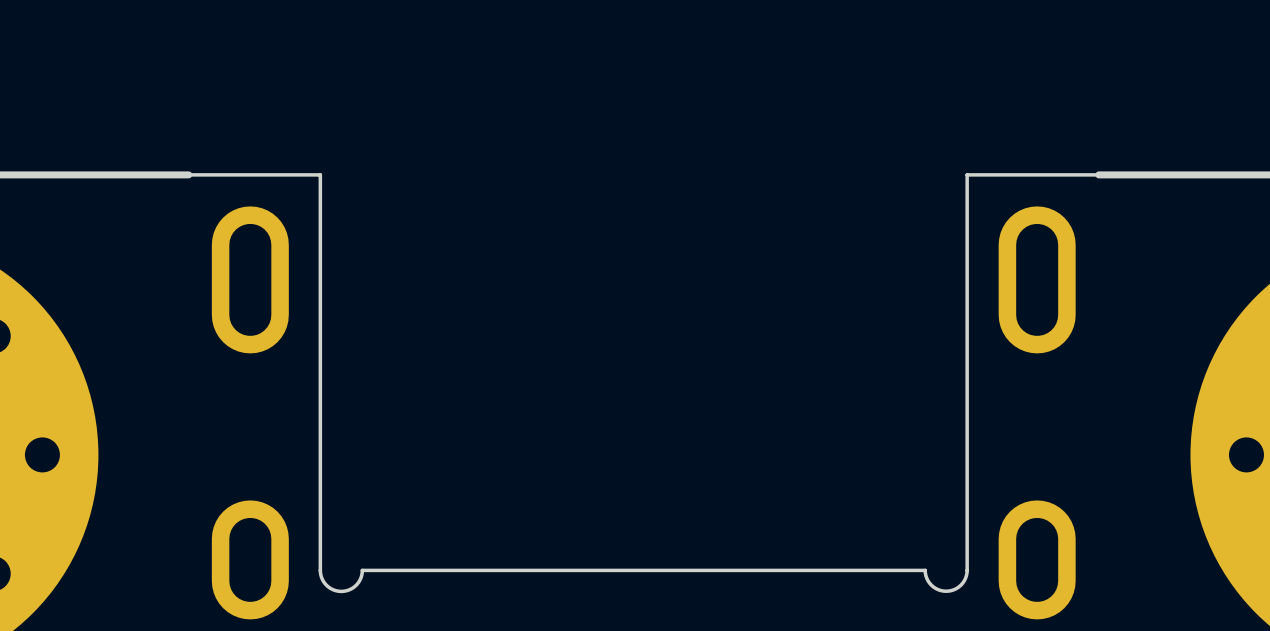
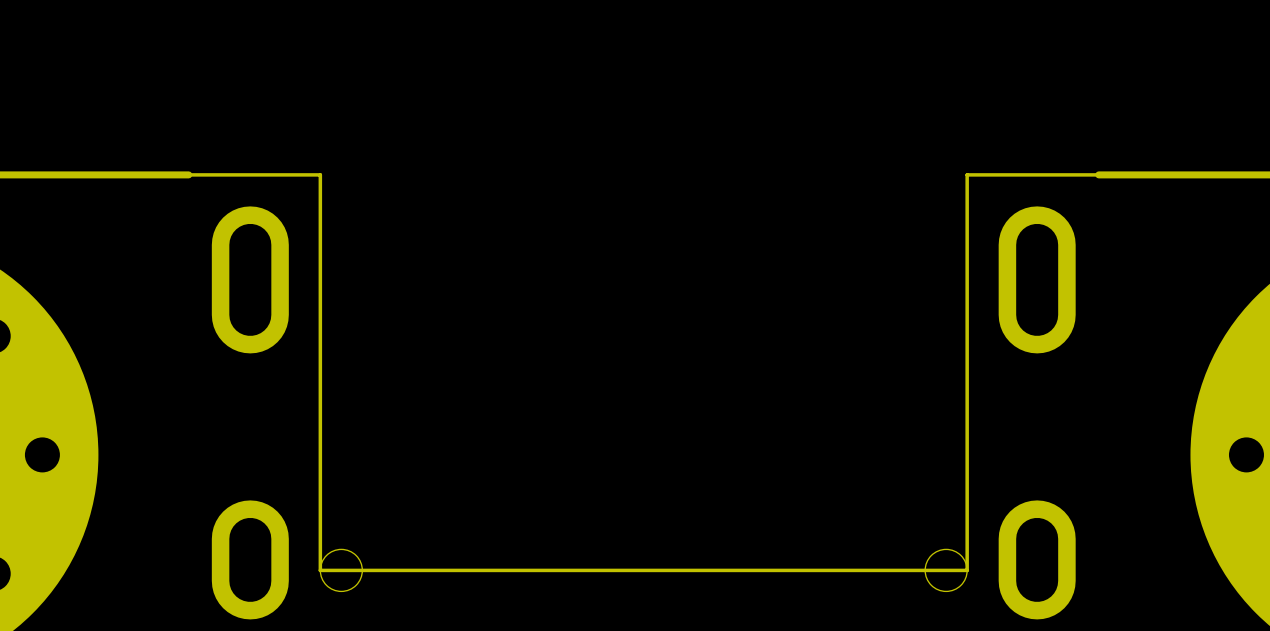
part footprint: [186, 173, 1101, 620] -> [186, 173, 1101, 620]

